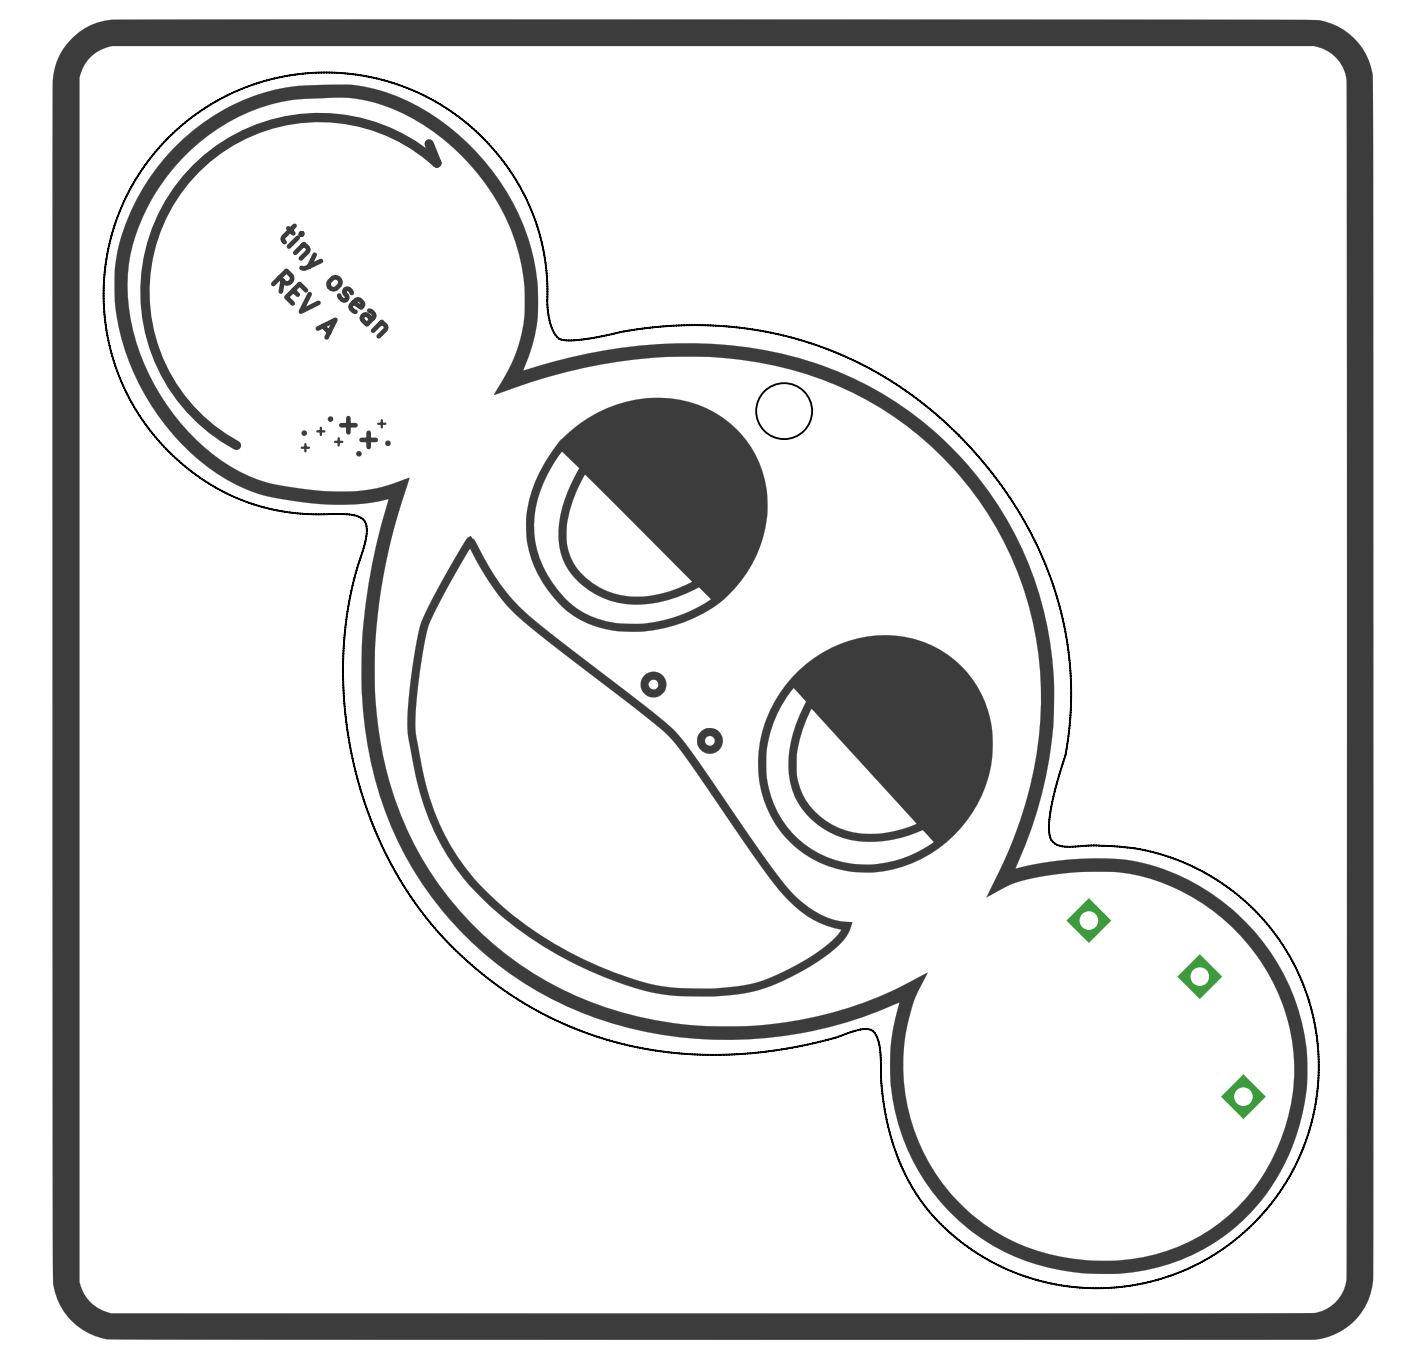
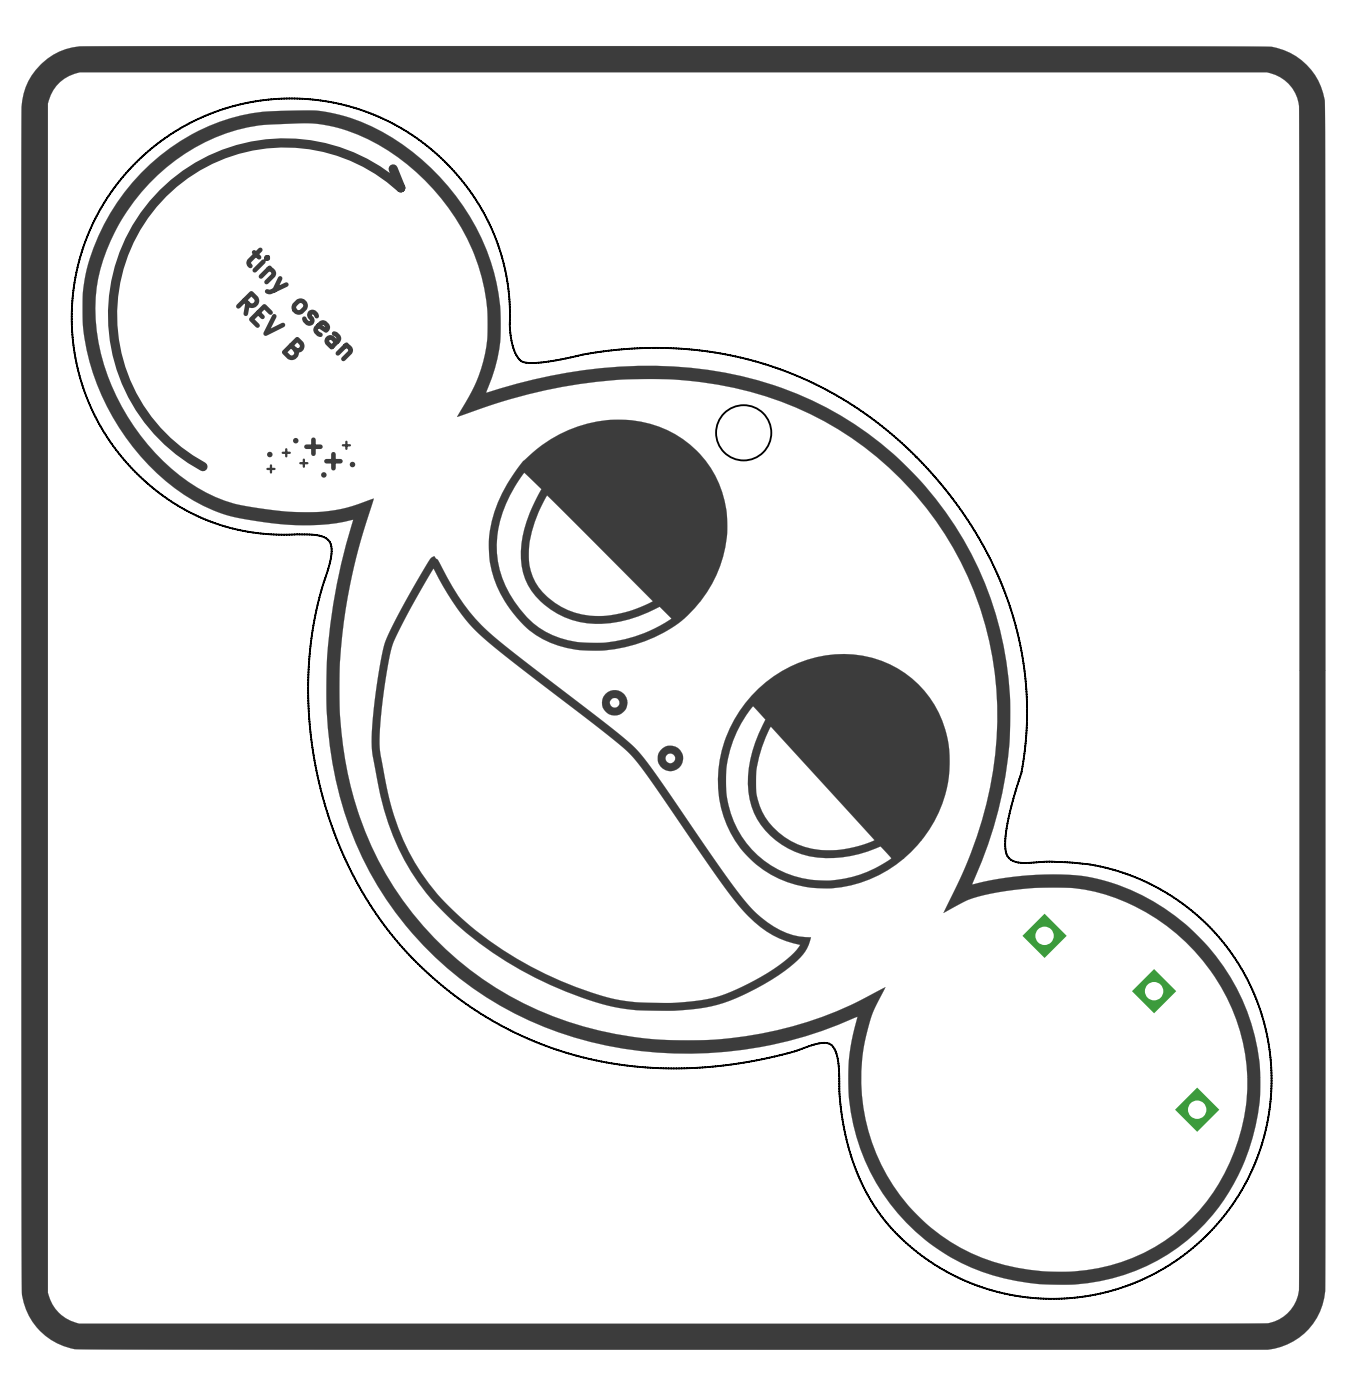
text: REV A (304, 304) -> REV B (270, 325)

